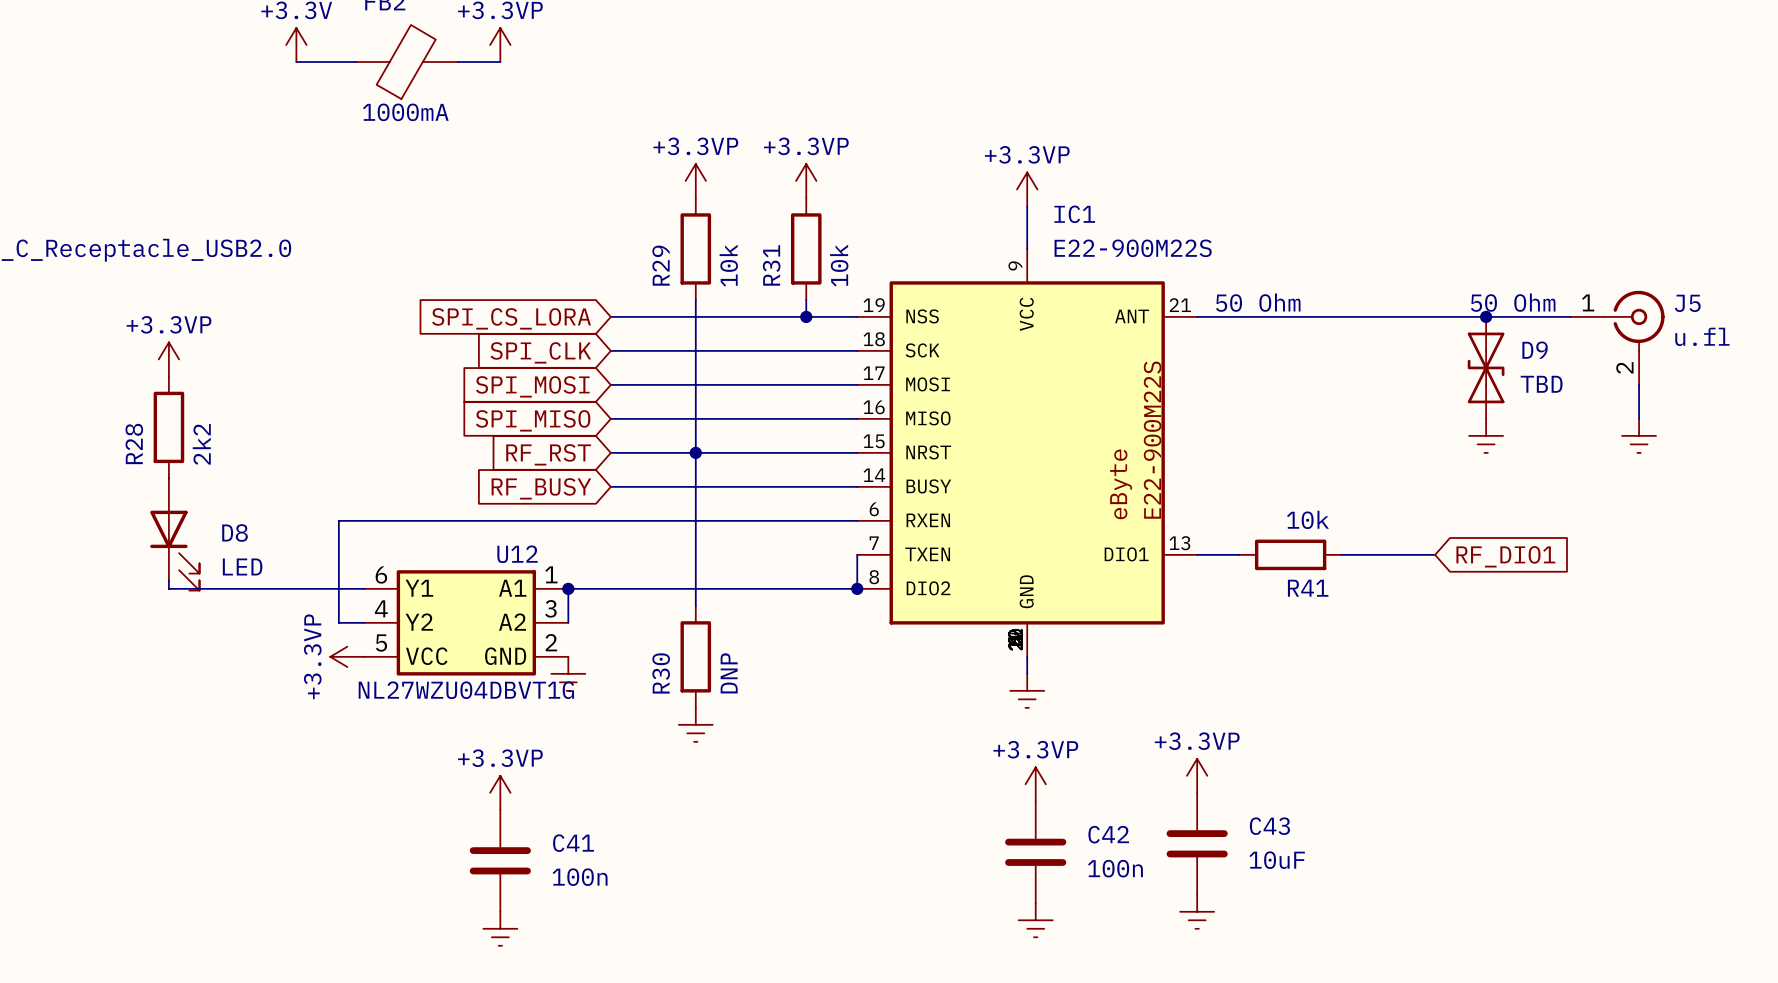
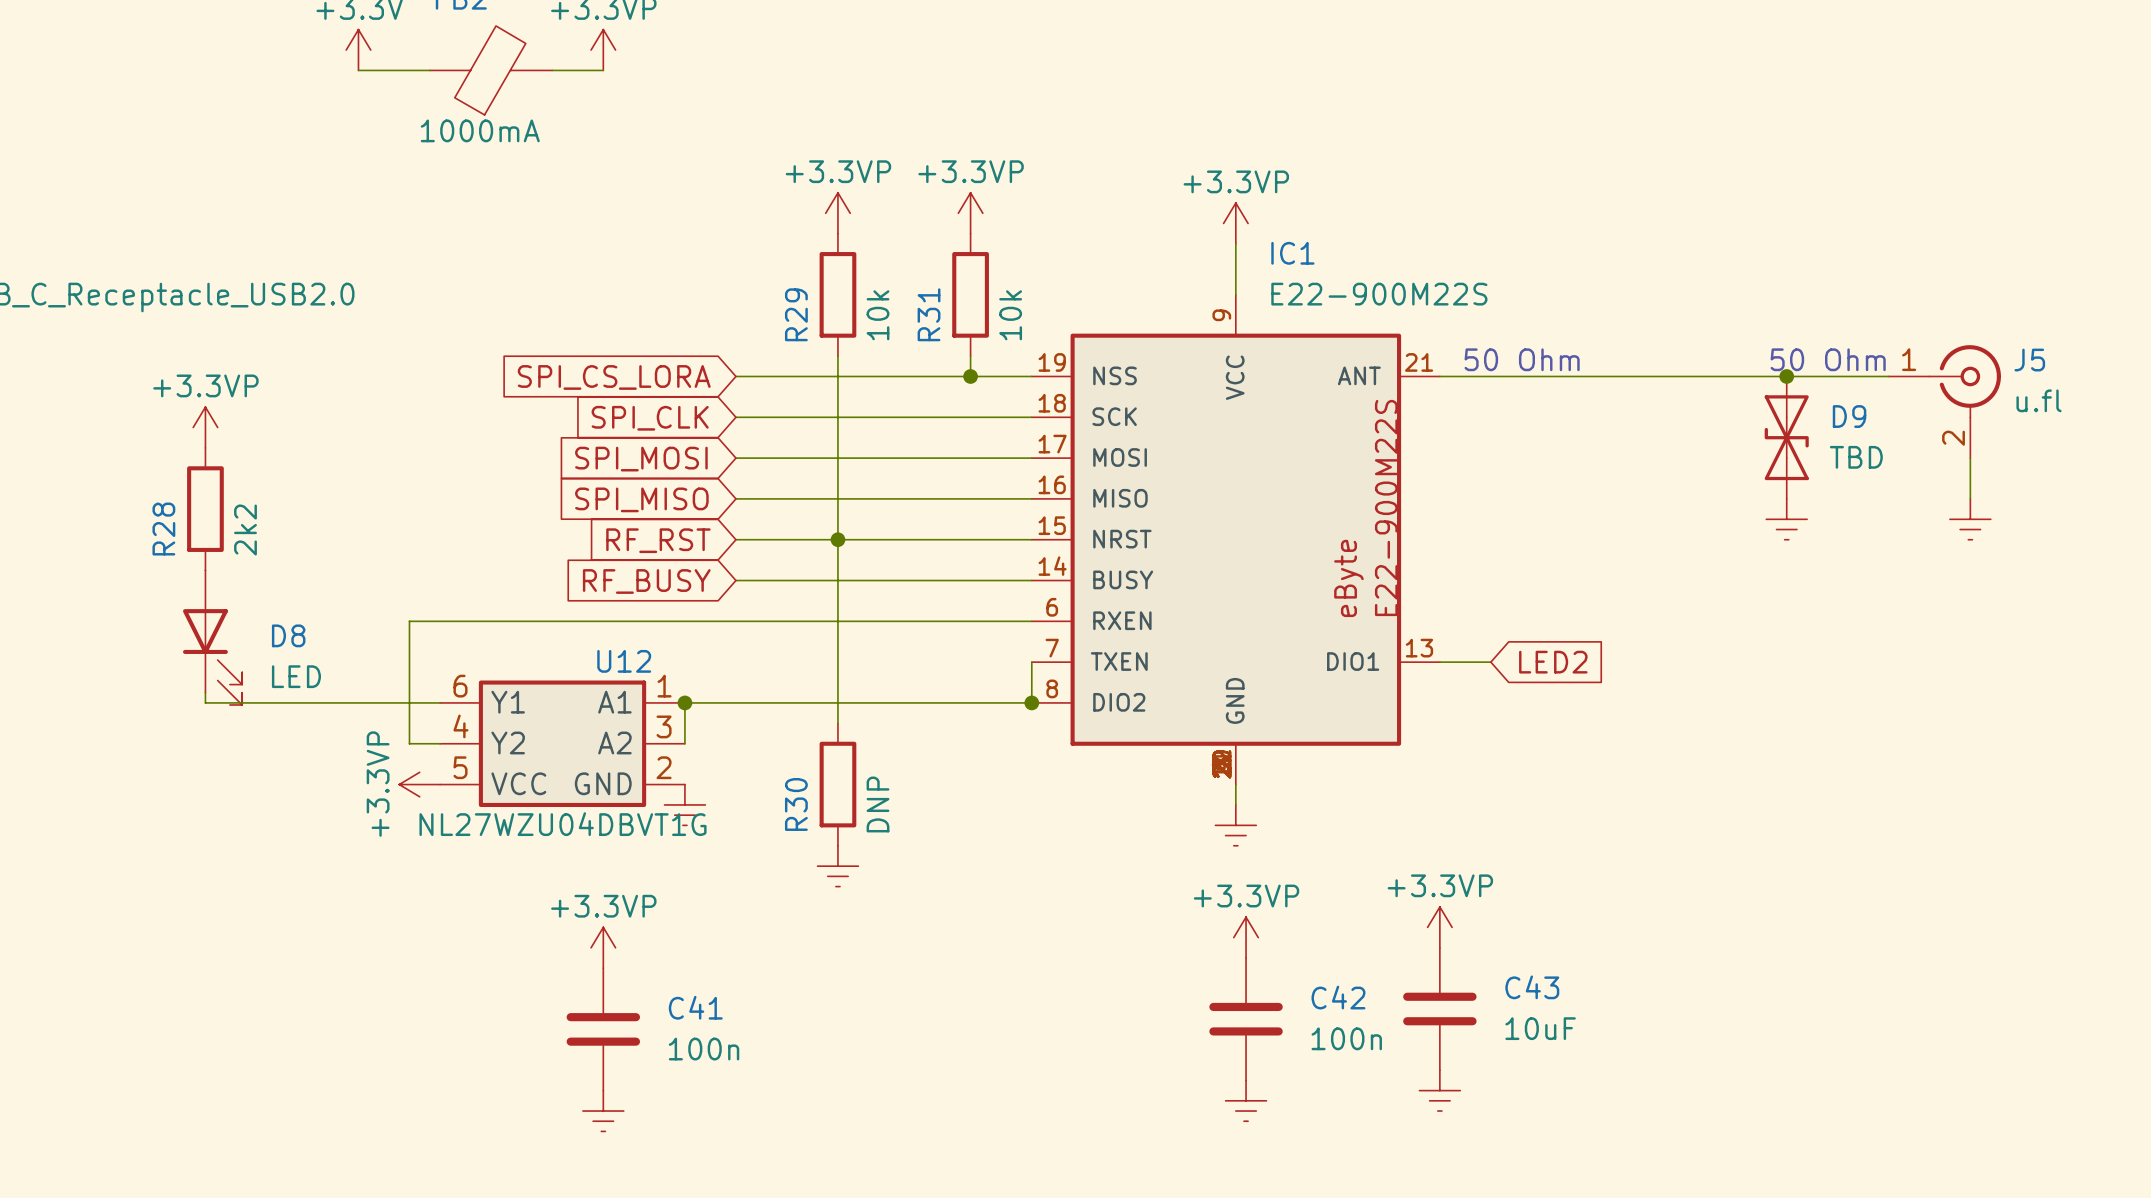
global label: none -> LED2 (1553, 662)
R41: 10k (1290, 554) -> none
wire: (1341, 554) (1435, 554) -> none
global label: RF_DIO1 (1505, 556) -> none

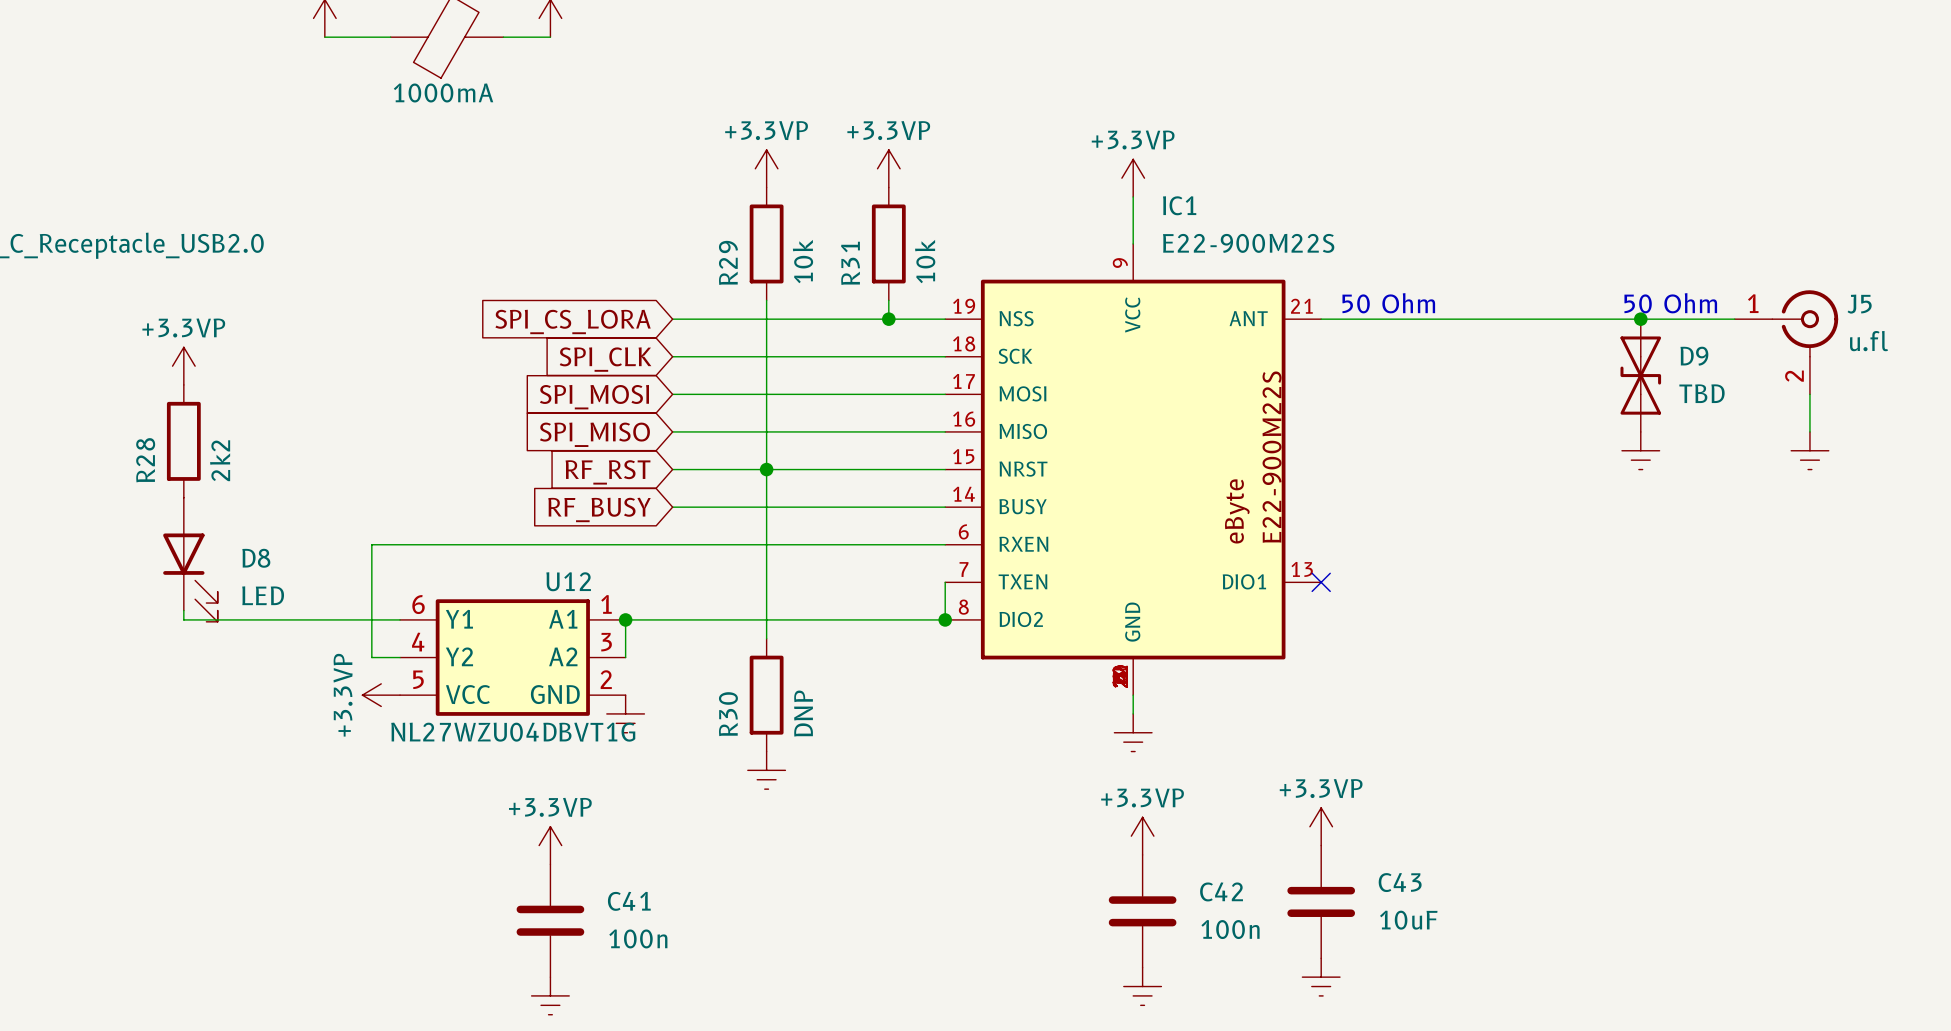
wire: (1439, 662) (1490, 662) -> none
no-connect mark: none -> (1321, 582)
global label: LED2 (1553, 662) -> none

